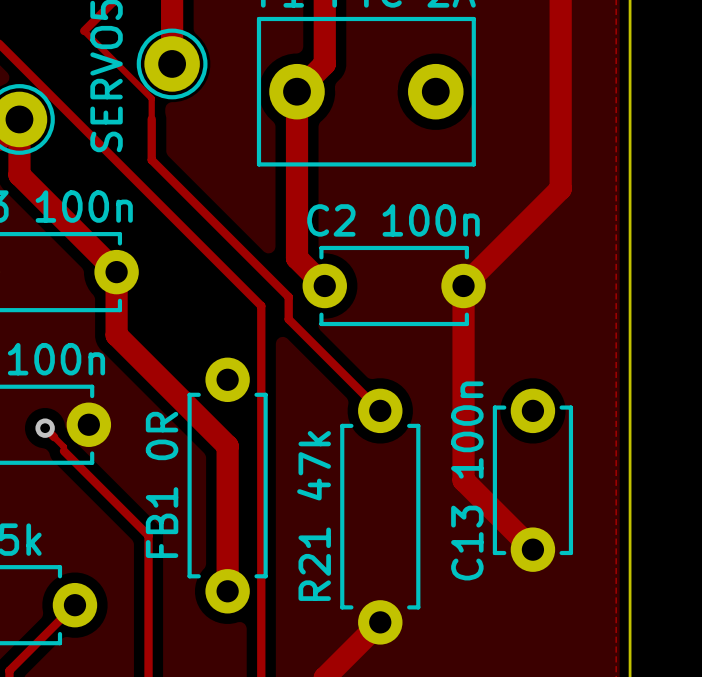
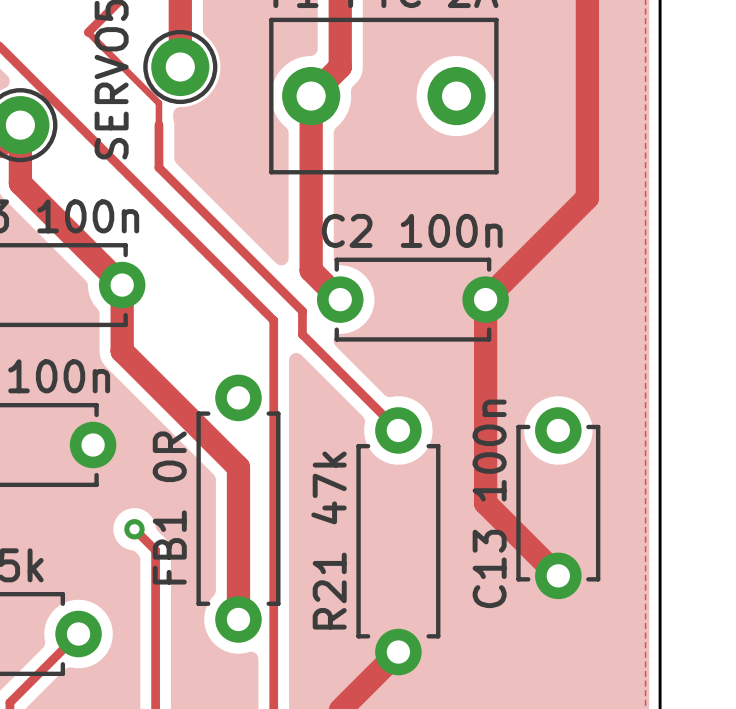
track: (45, 428) (63, 446) (63, 451) (148, 535) -> (134, 529) (155, 550) (155, 561)
via: (45, 428) -> none
via: none -> (134, 529)

